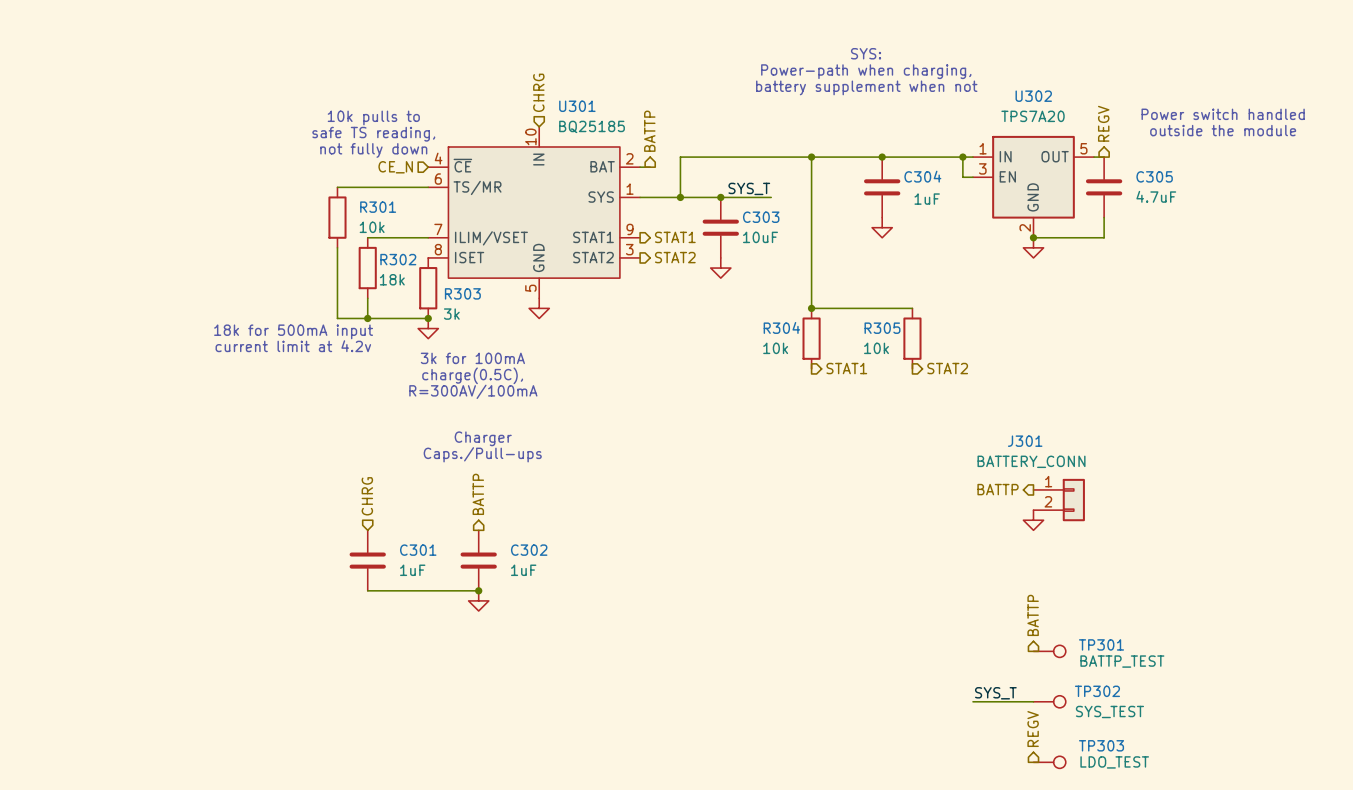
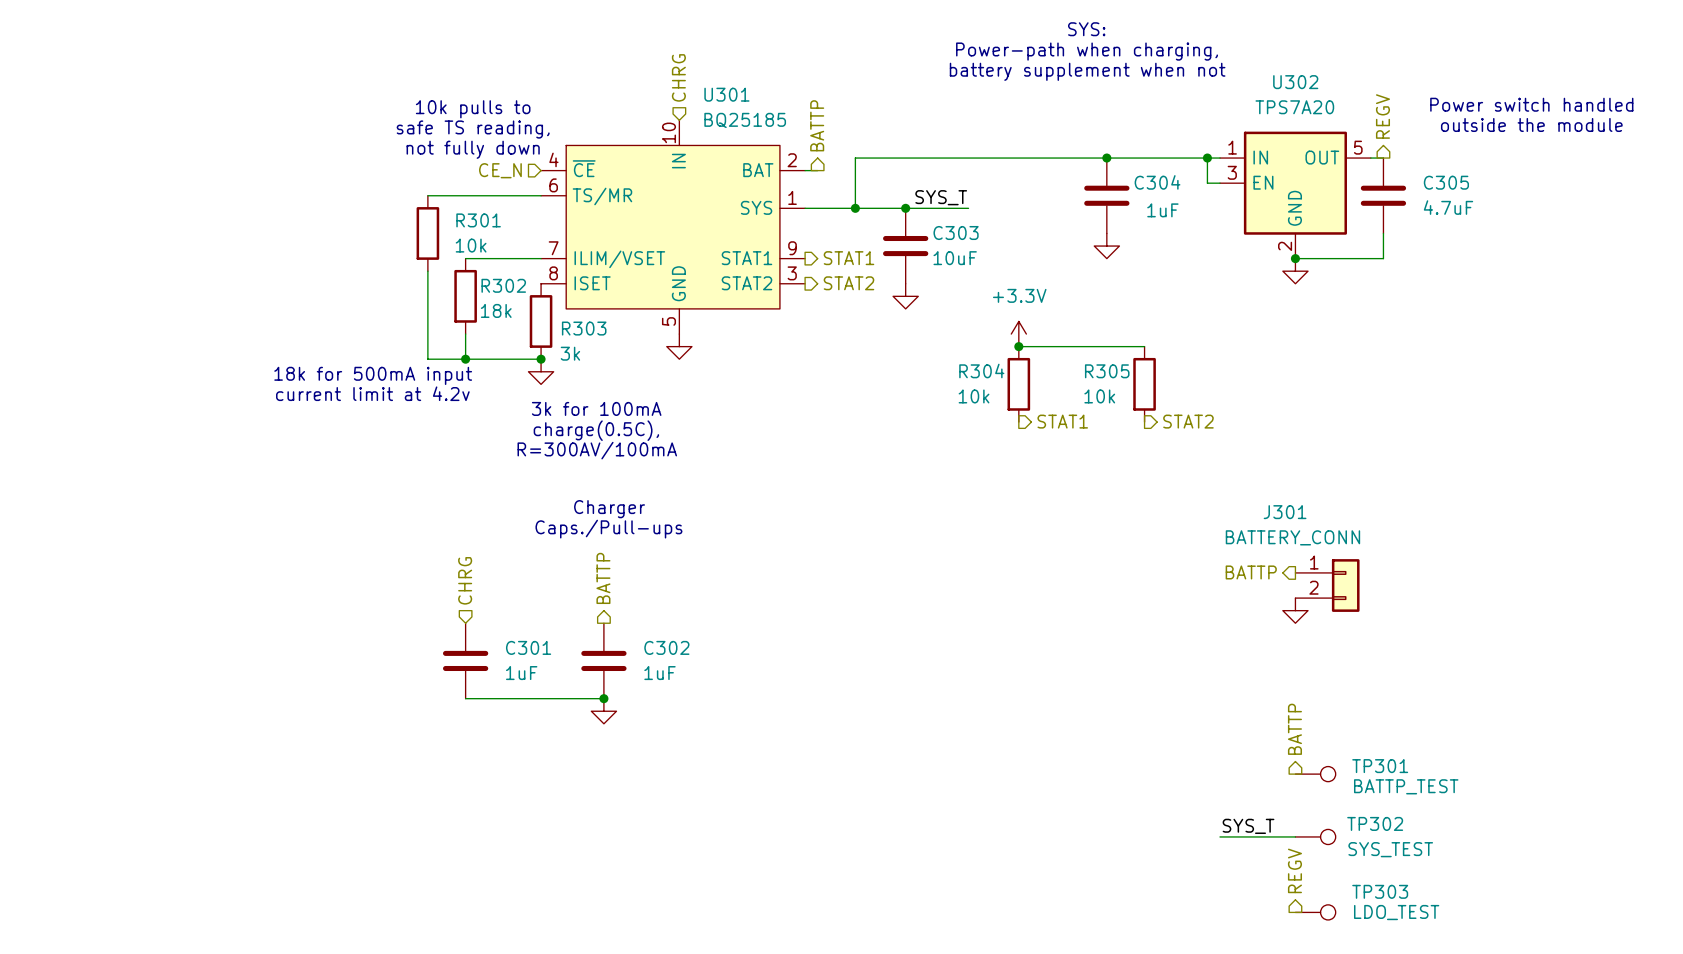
wire: (811, 157) (811, 308) -> none
junction: (811, 157) -> none
power symbol: none -> +3.3V (1018, 334)

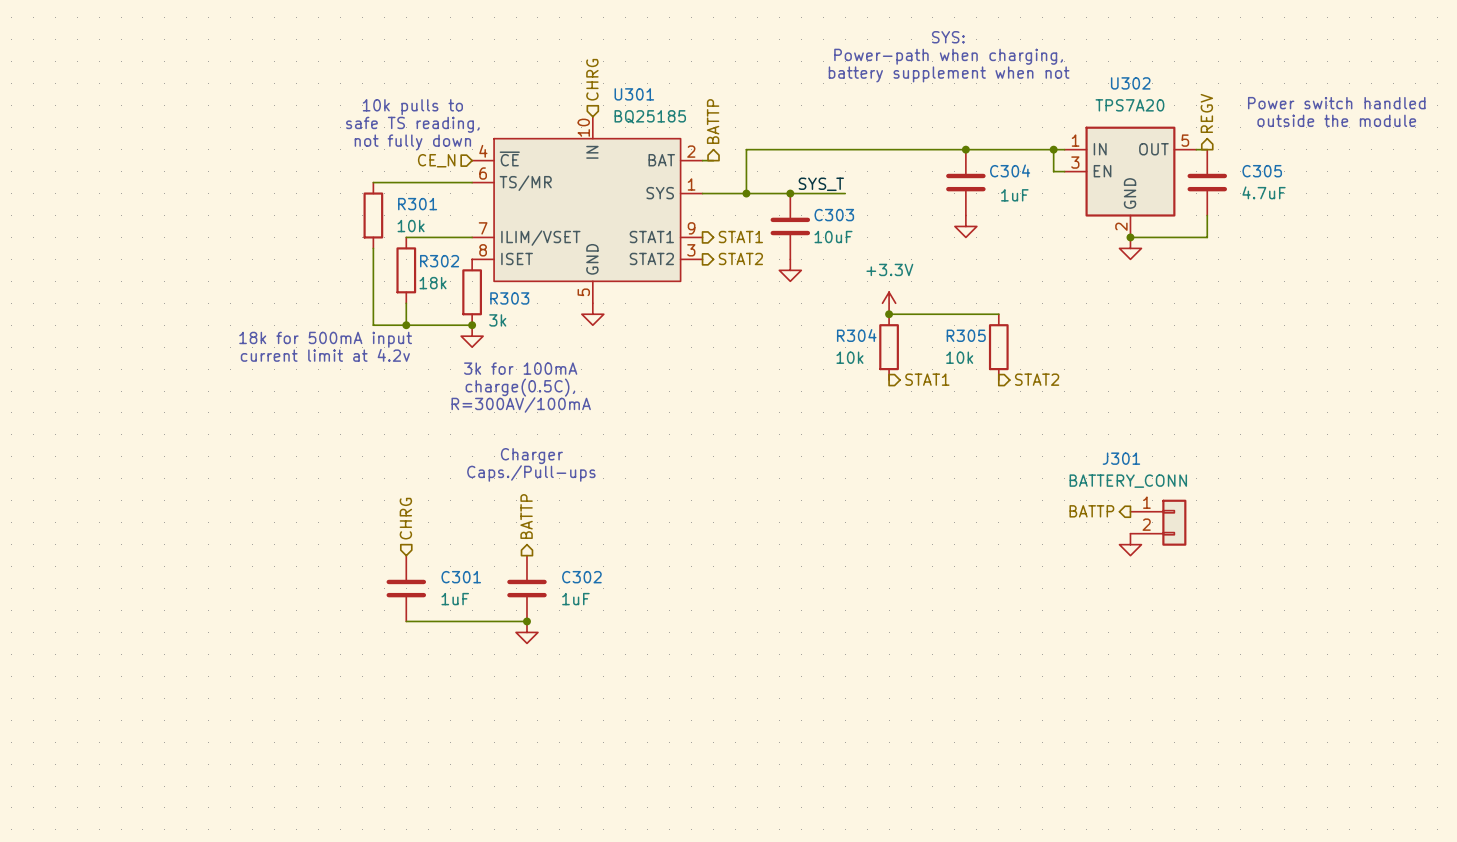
hierarchical label: BATTP (1294, 729) -> none
TP301: BATTP_TEST (1315, 774) -> none
label: SYS_T (1248, 826) -> none
wire: (1219, 836) (1295, 836) -> none
TP302: SYS_TEST (1315, 836) -> none
hierarchical label: REGV (1294, 870) -> none
TP303: LDO_TEST (1315, 912) -> none

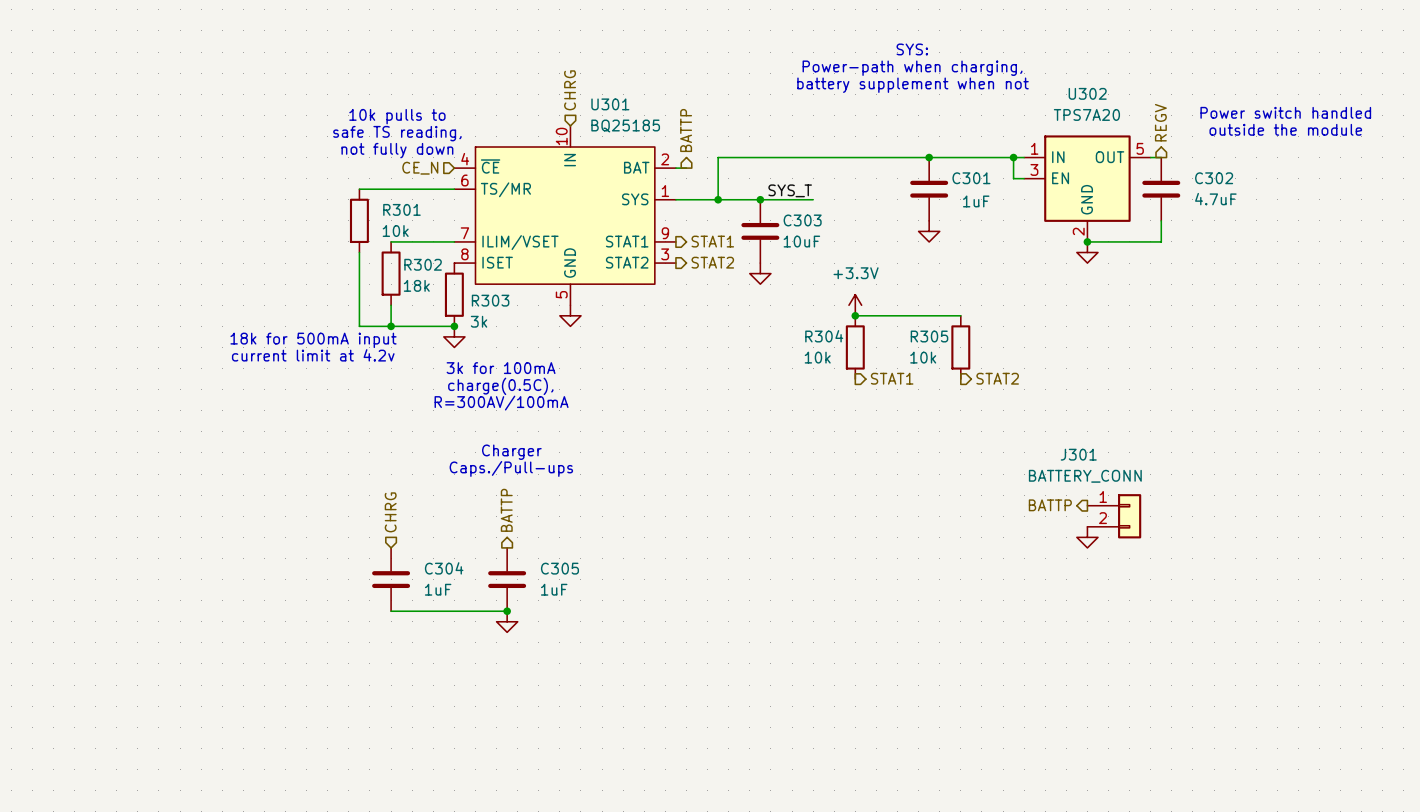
C304 name: C304 (1010, 170) -> C301 (971, 178)
C305 name: C305 (1262, 171) -> C302 (1214, 178)
C301 name: C301 (461, 577) -> C304 (444, 568)
C302 name: C302 (581, 577) -> C305 (559, 568)

